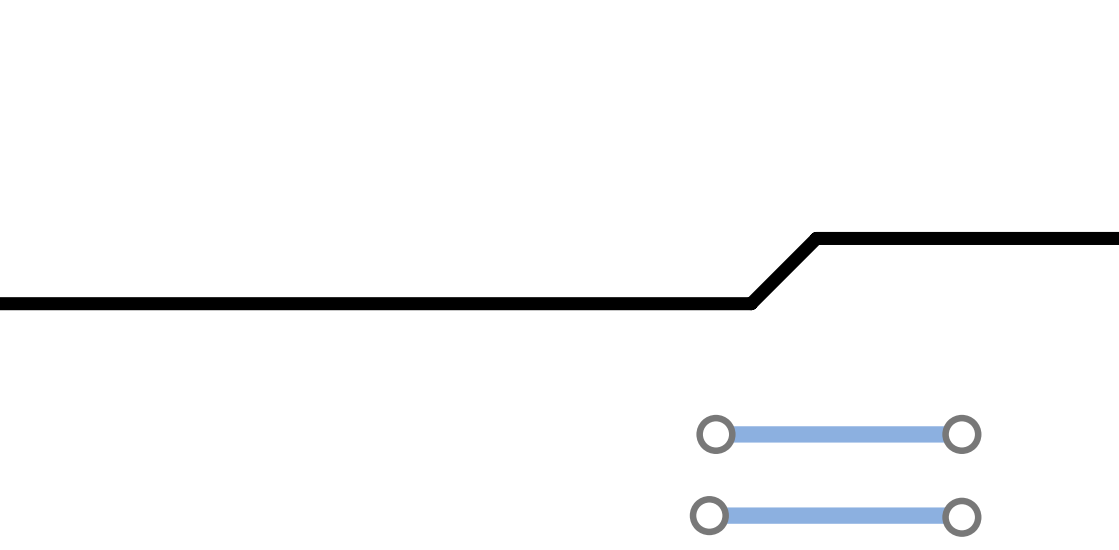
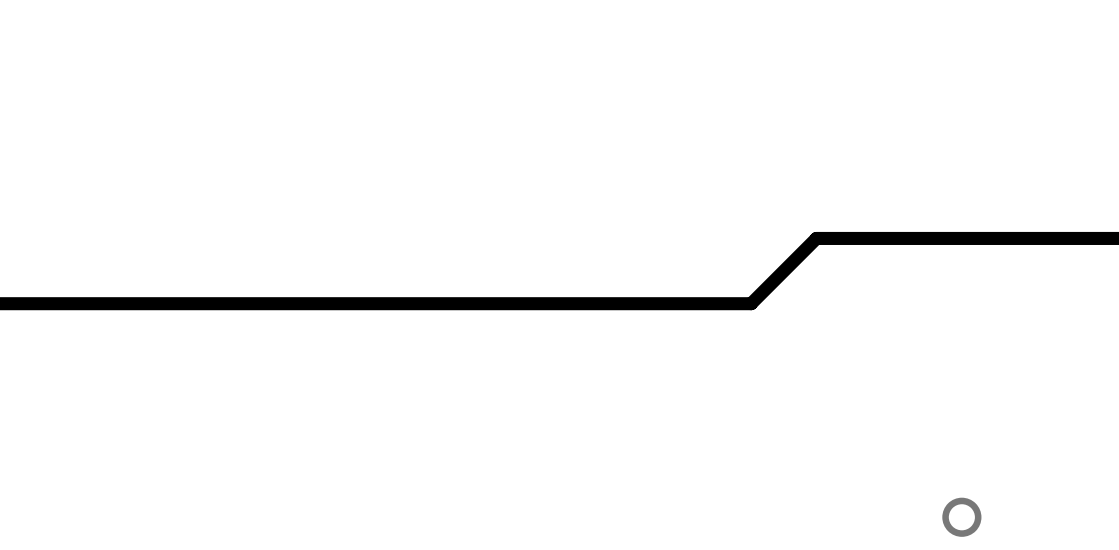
via: (715, 434) -> none
track: (961, 434) (715, 434) -> none
via: (961, 434) -> none
track: (709, 515) (960, 515) (961, 517) -> none
via: (709, 515) -> none

